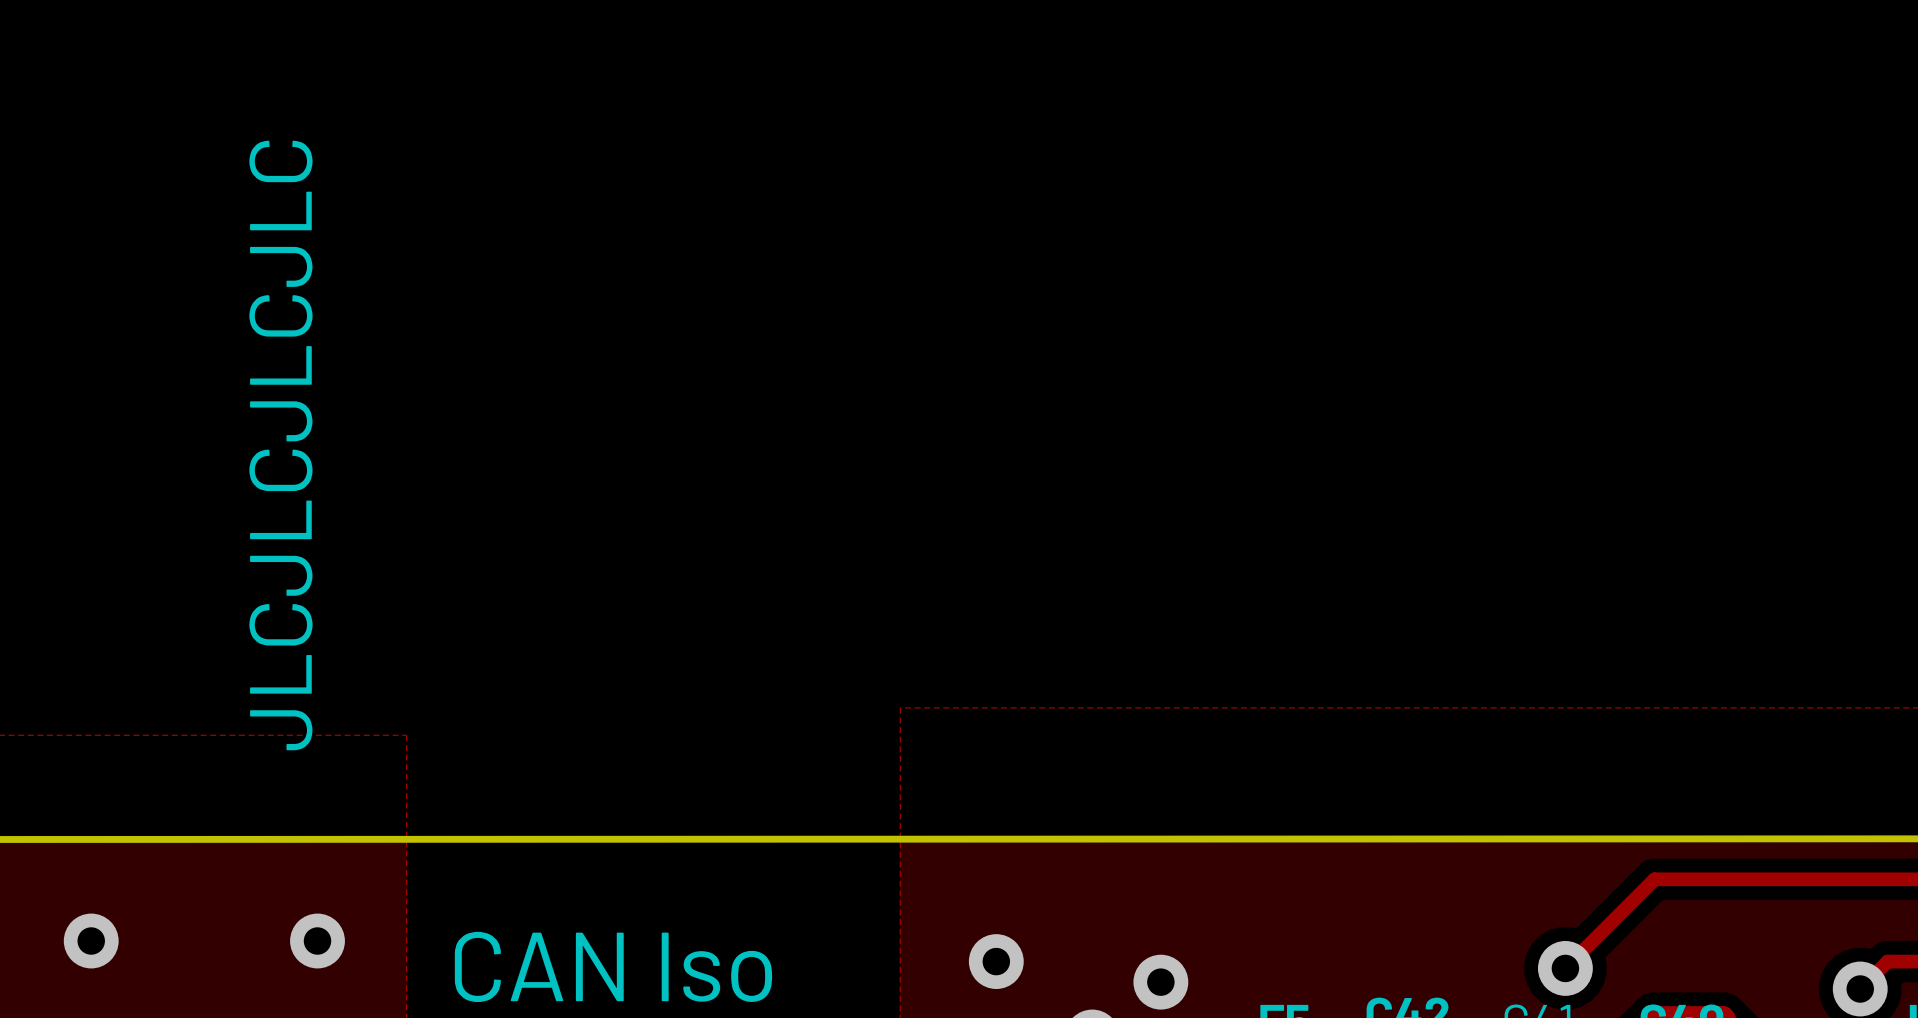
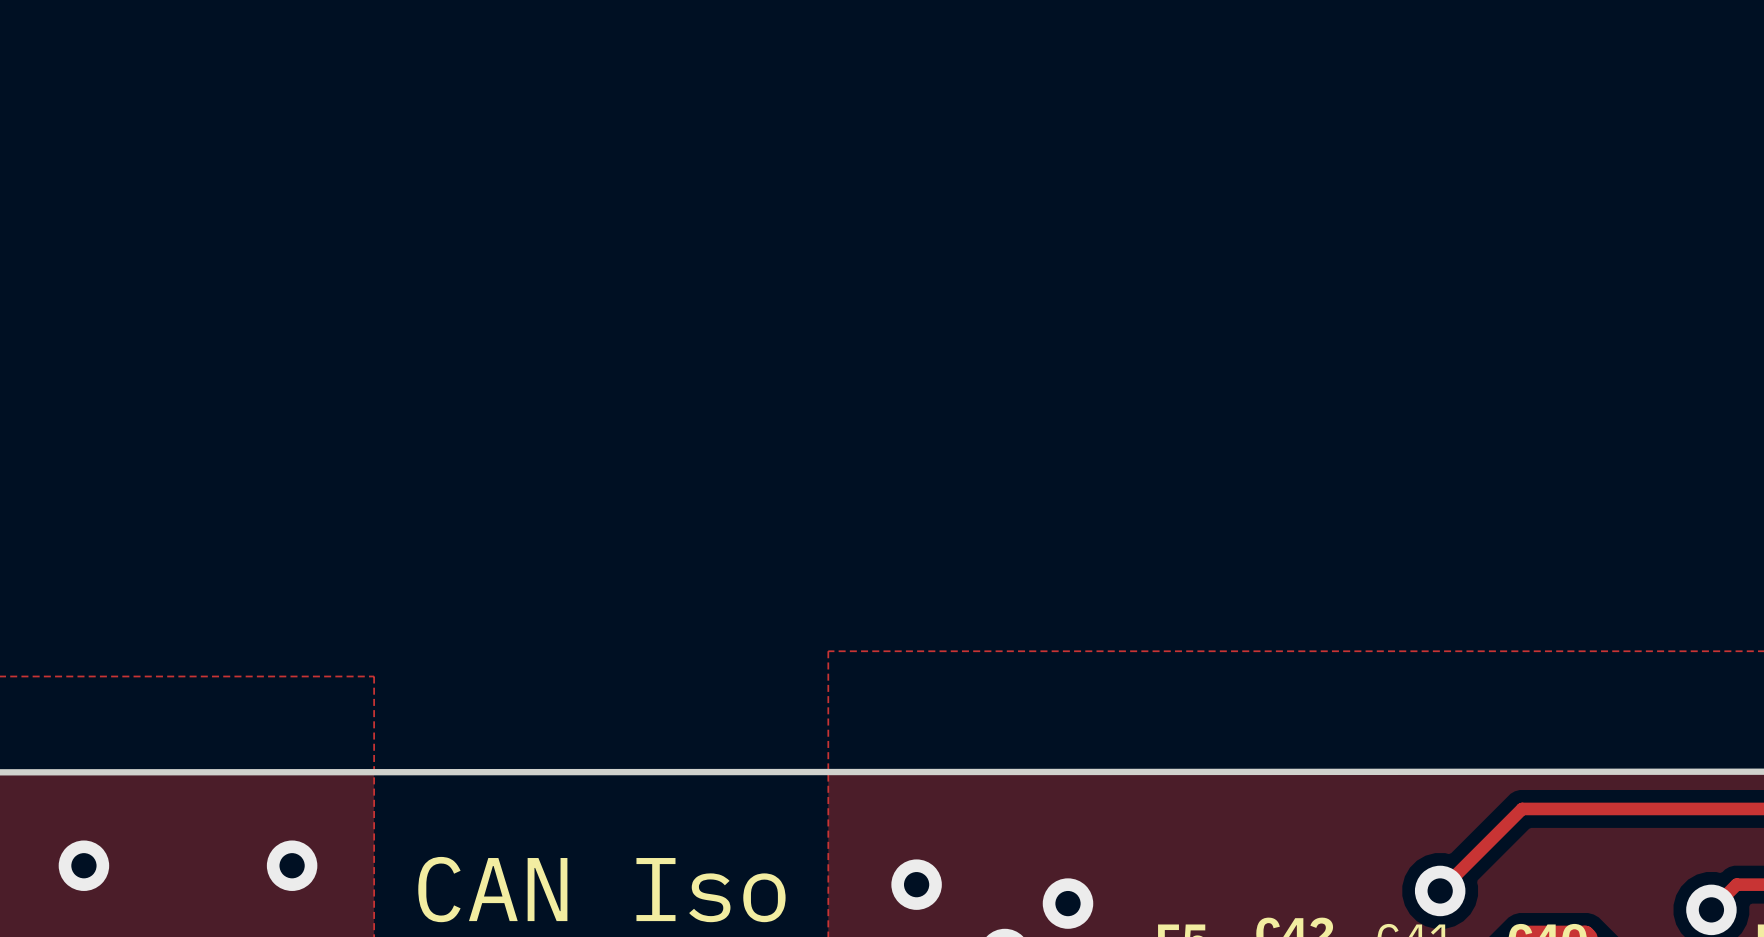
text: JLCJLCJLCJLC (280, 445) -> none

